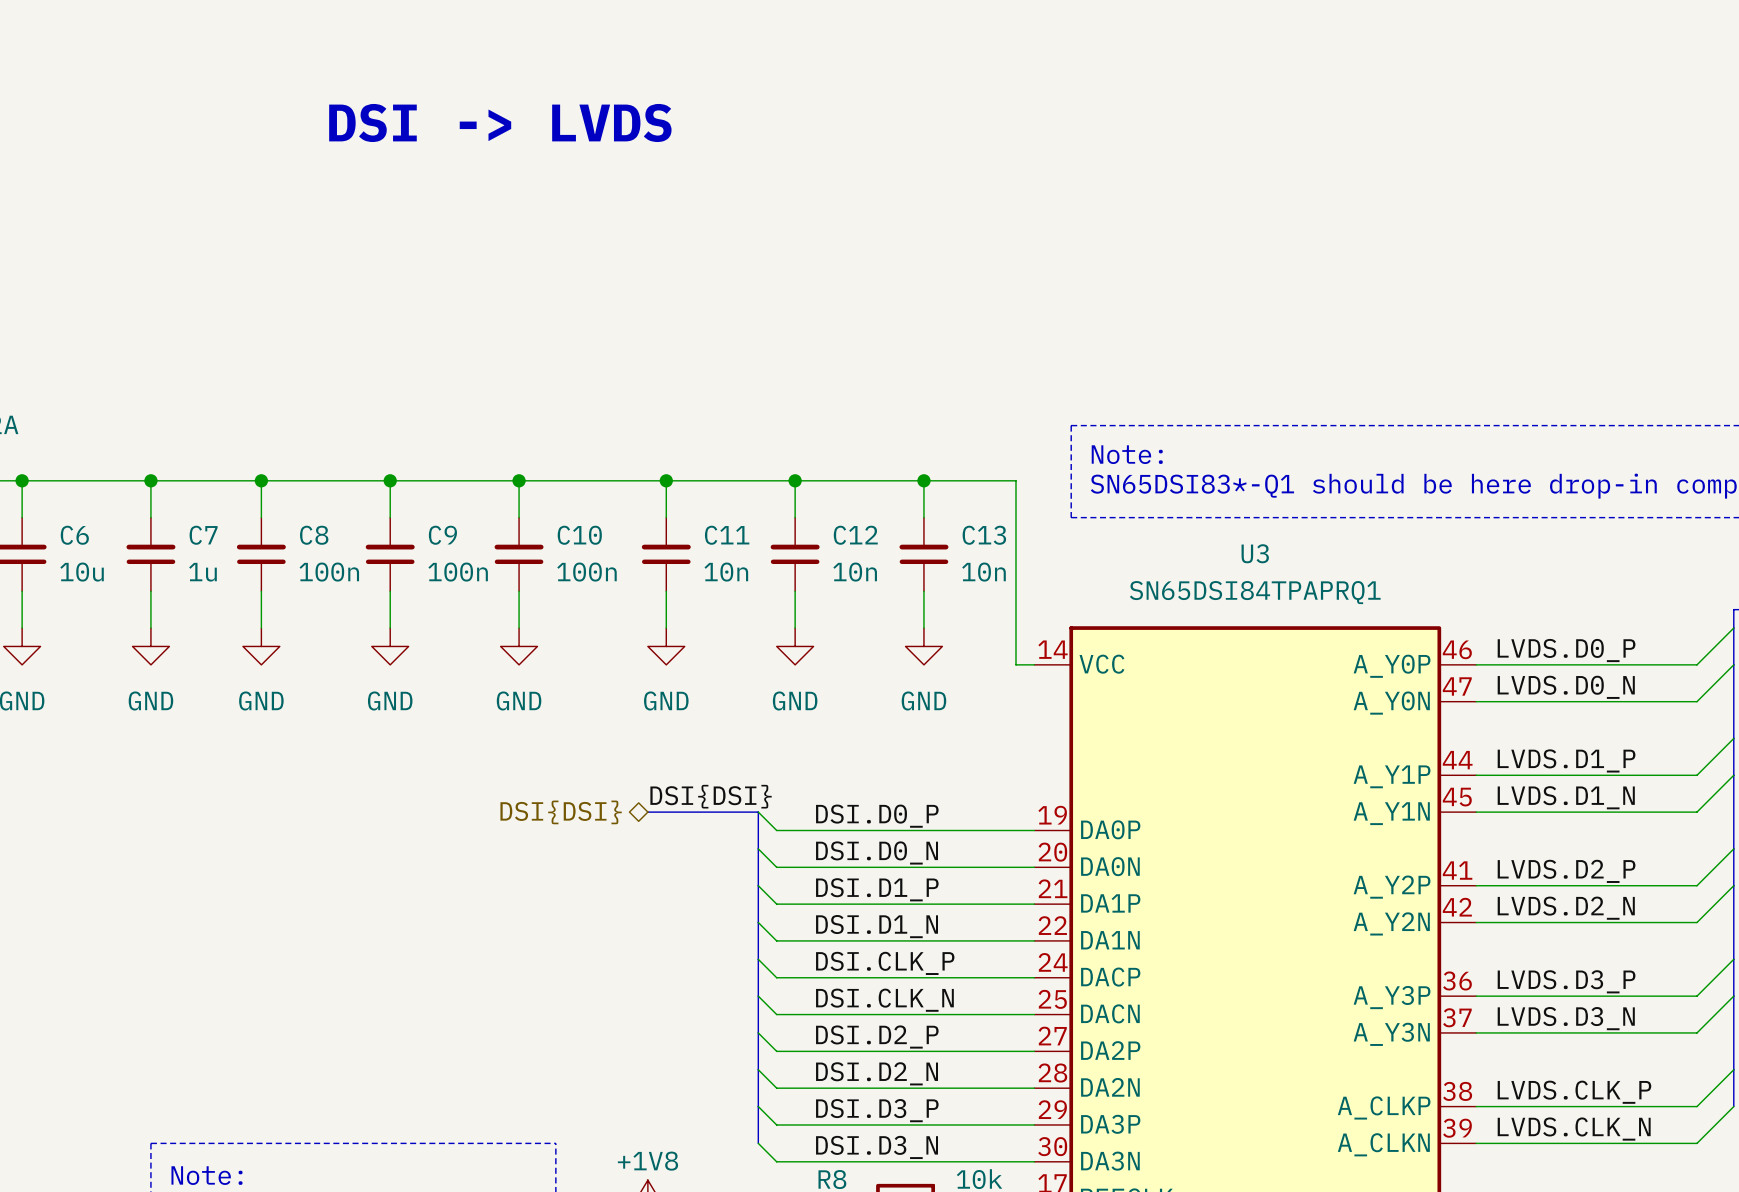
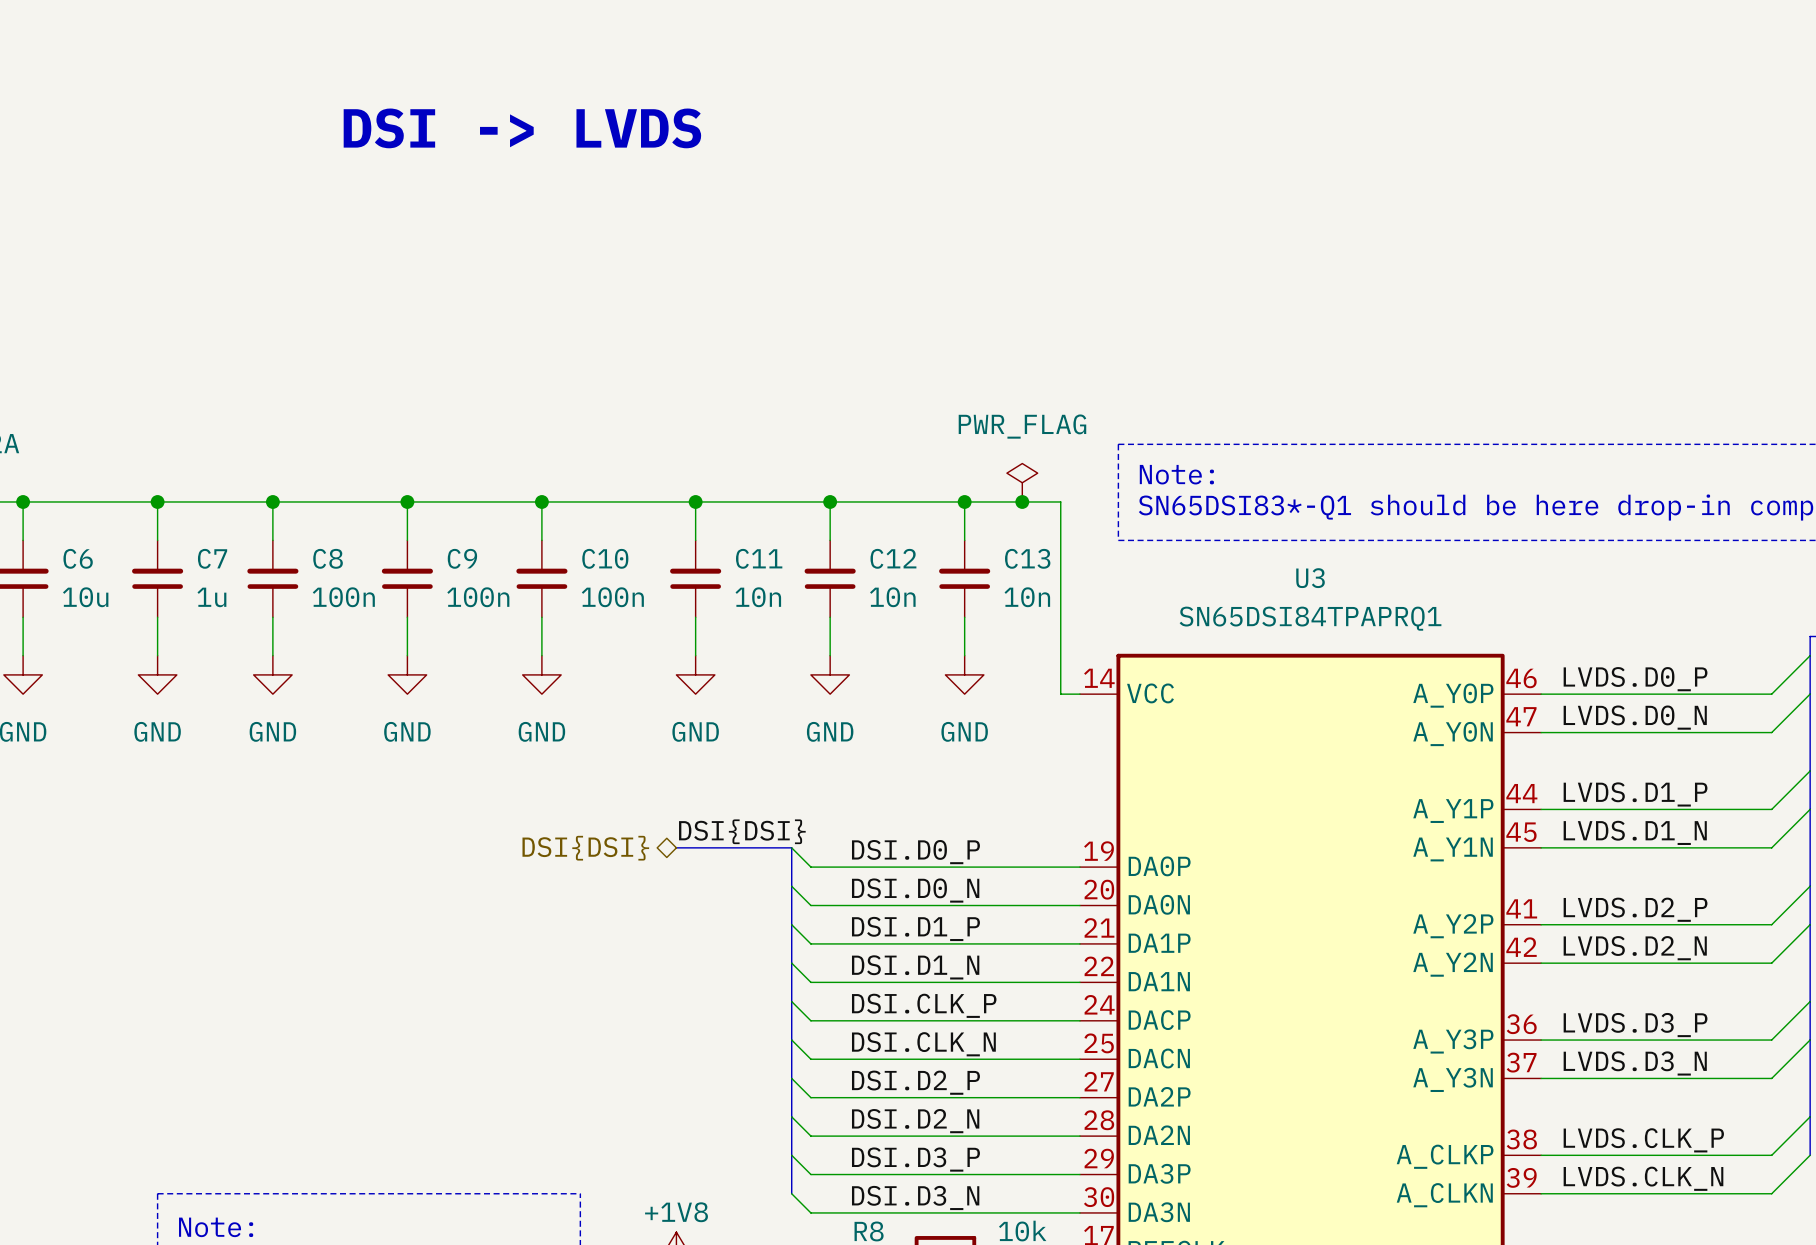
power symbol: none -> PWR_FLAG (1022, 482)
junction: none -> (1022, 501)

